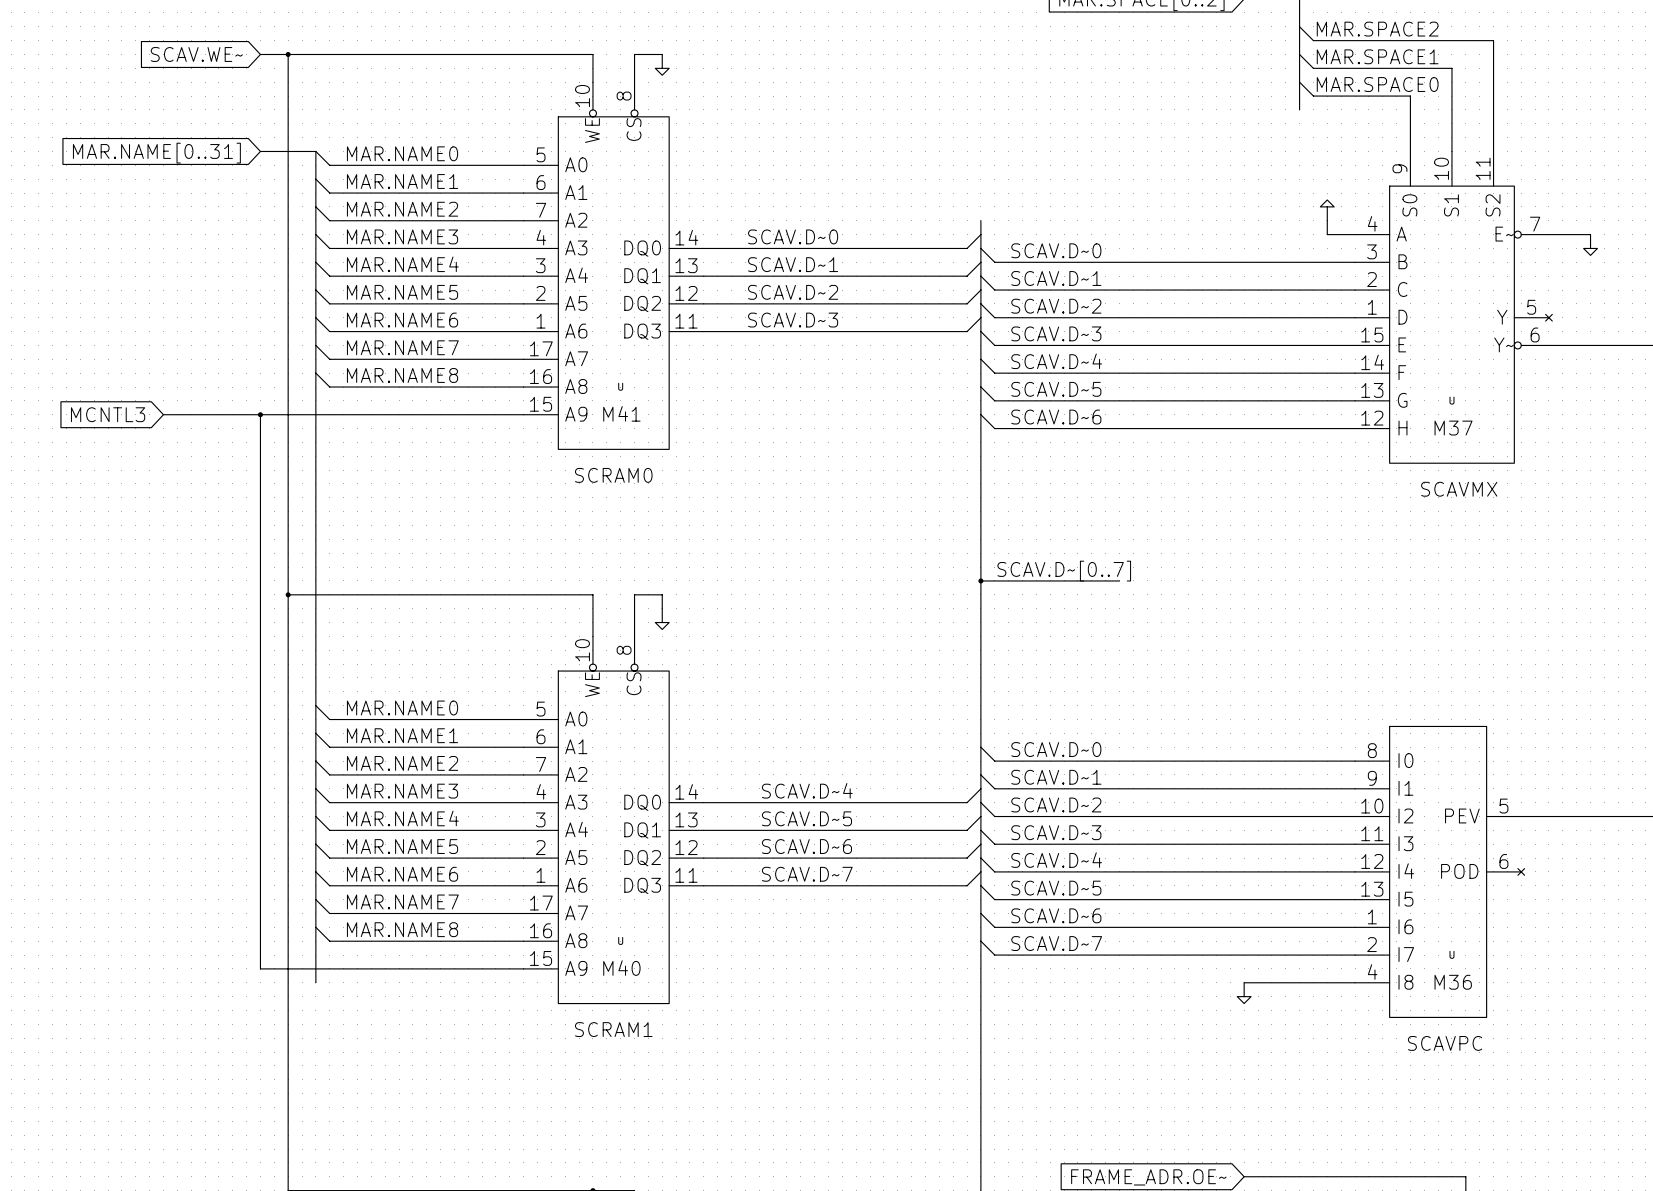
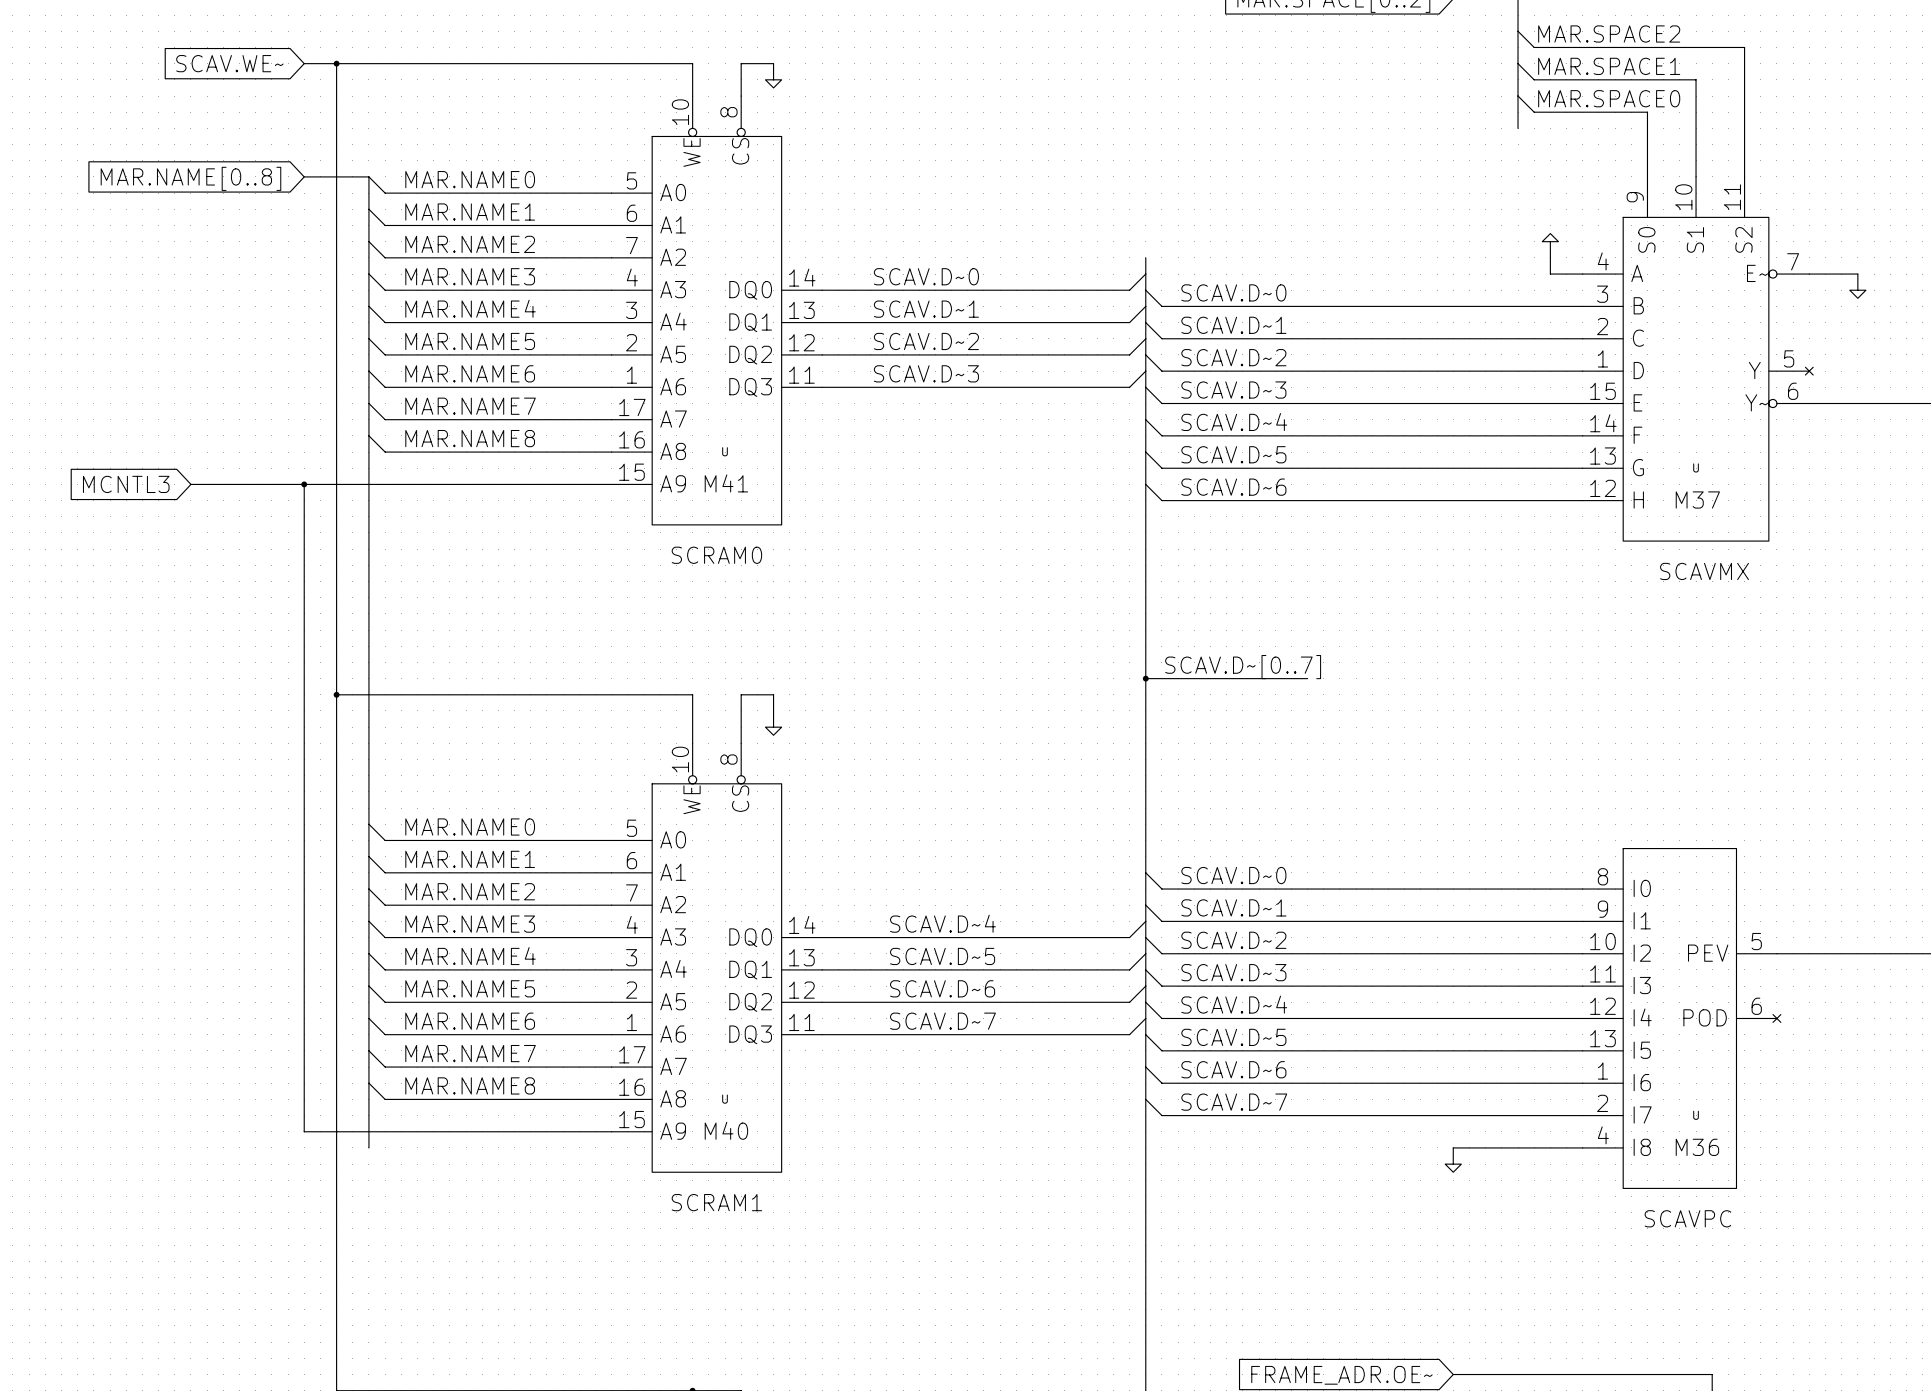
global label: MAR.NAME[0..31] (156, 153) -> MAR.NAME[0..8] (190, 178)

